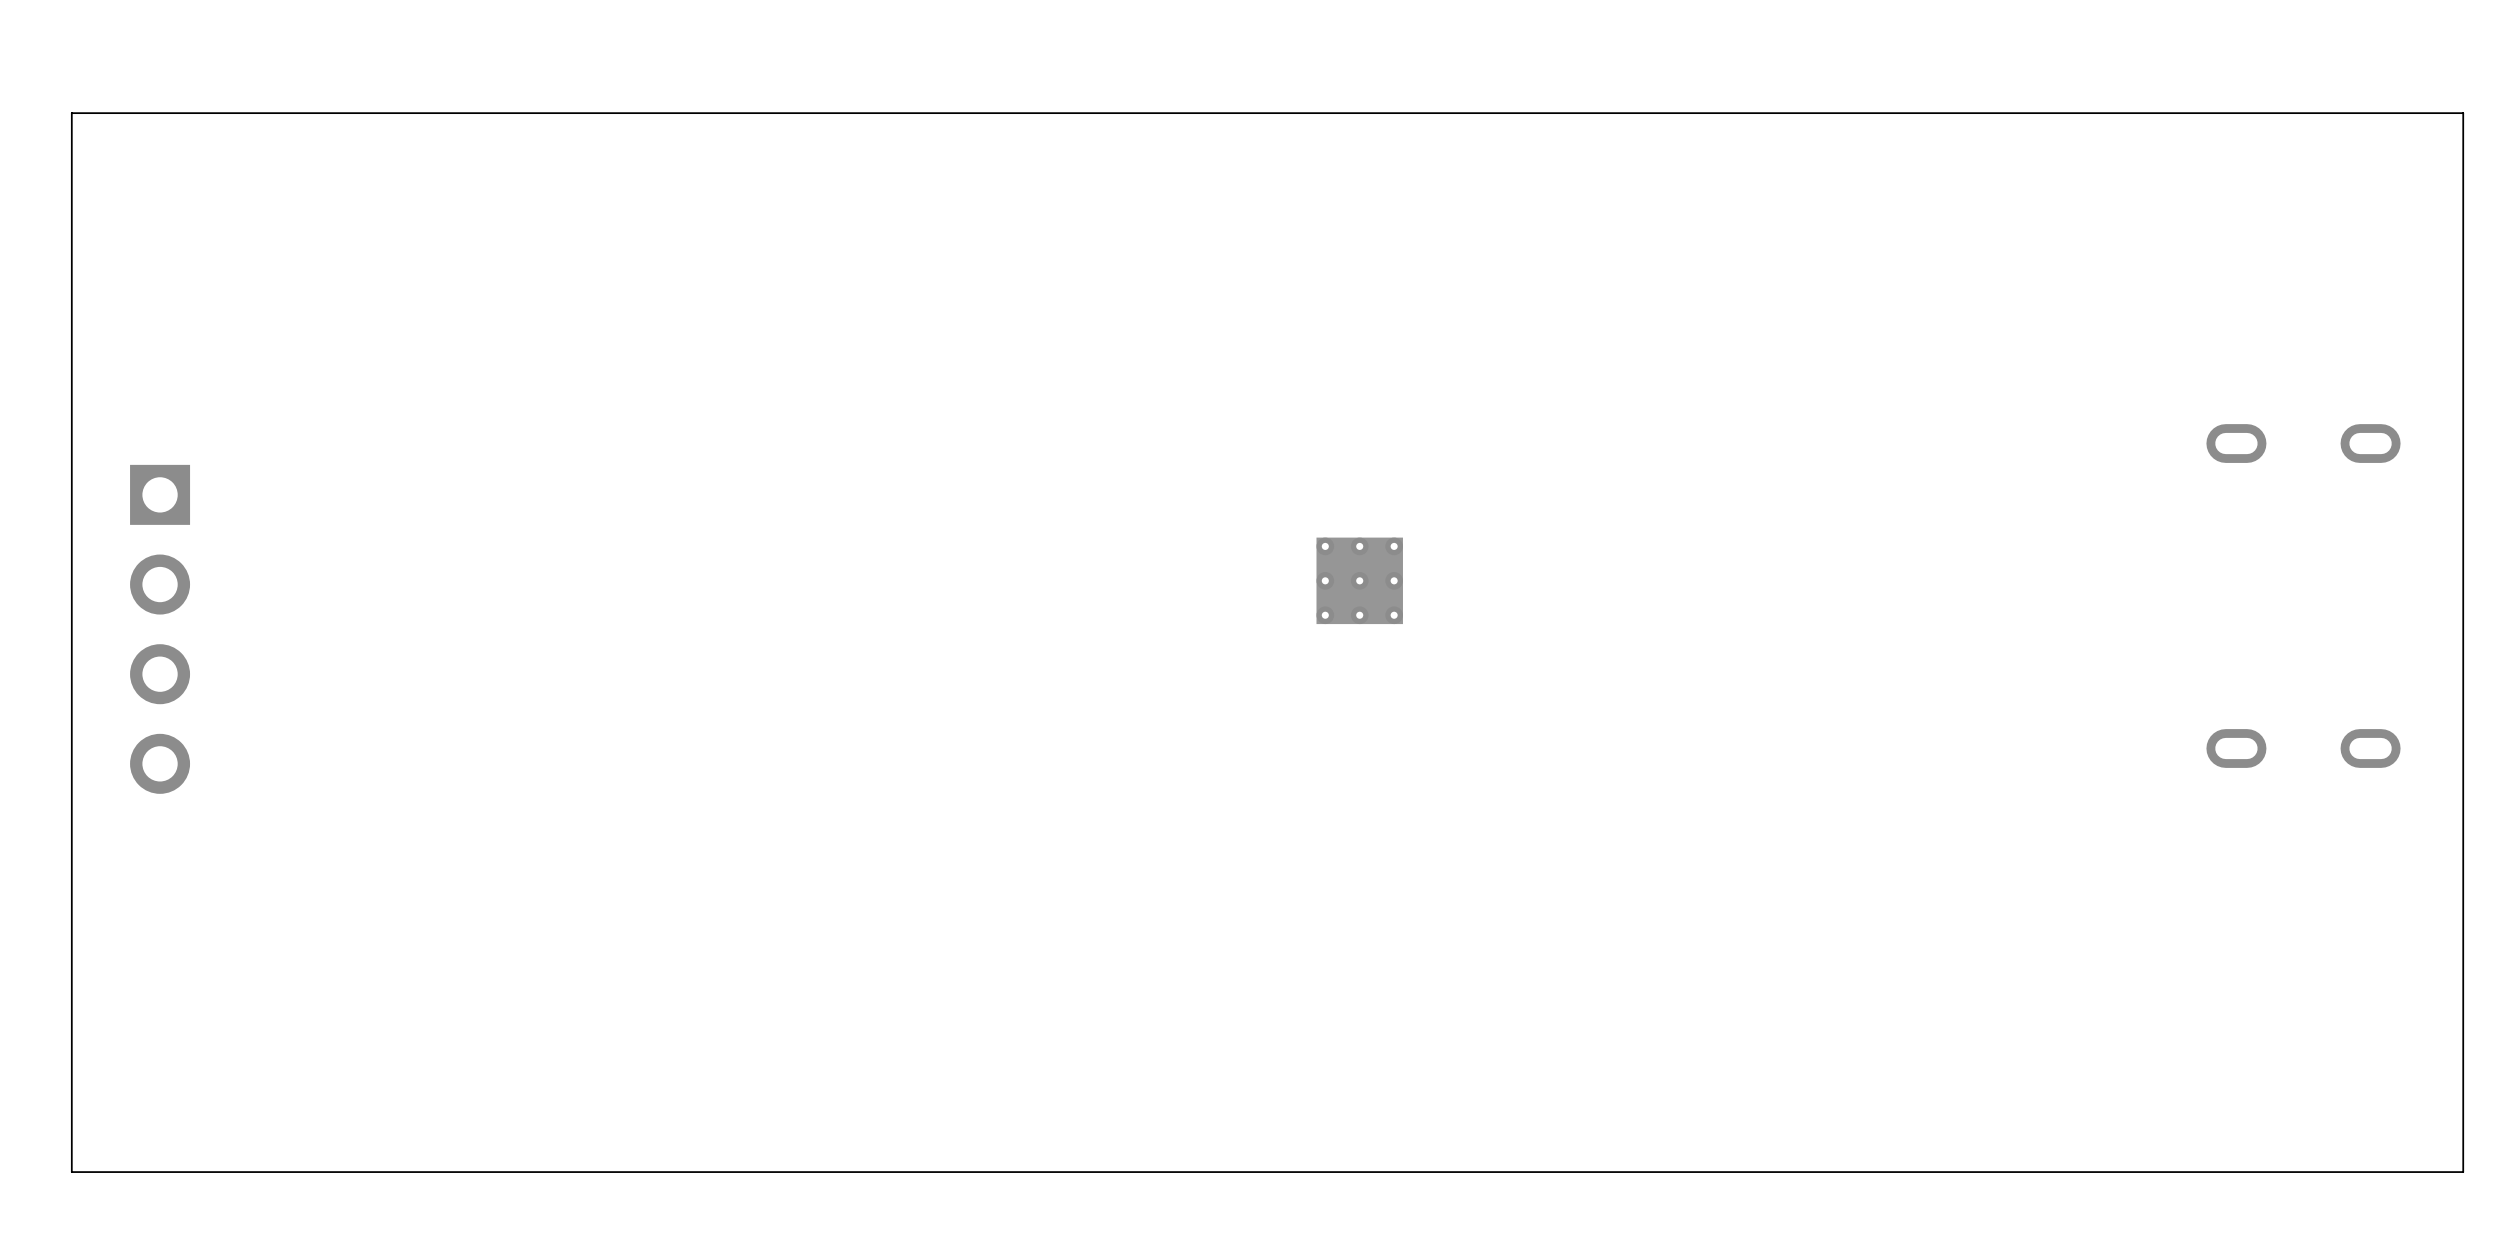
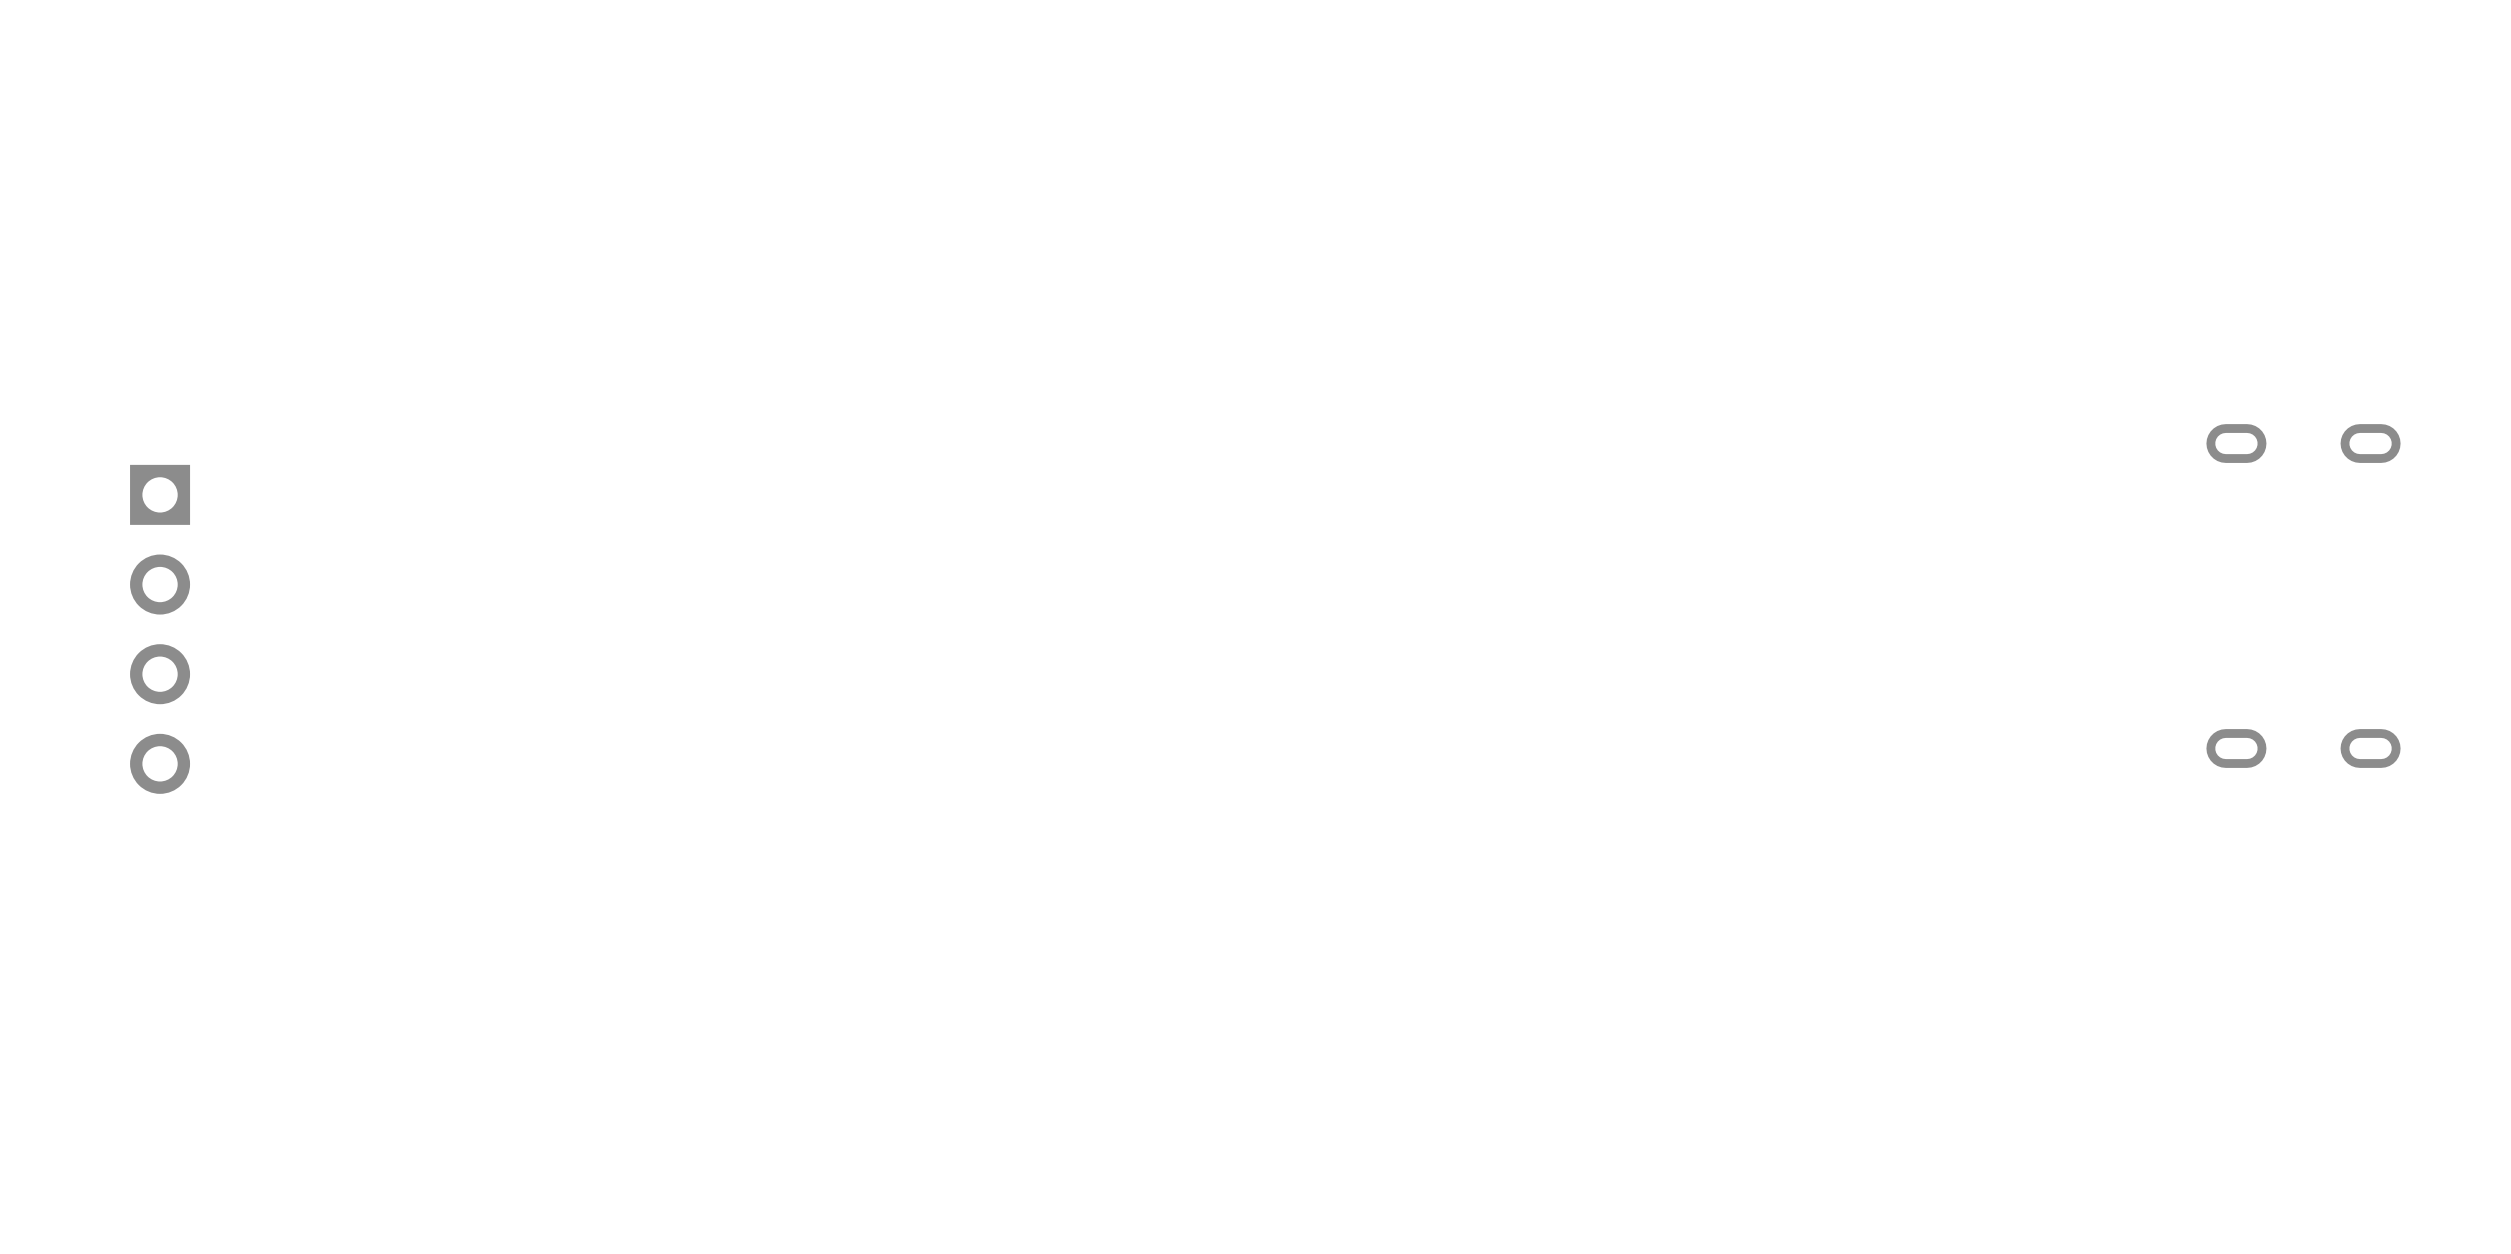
board edge: (2463, 113) (71, 113) (71, 1172) (2463, 1172) (2463, 113) -> none
part: (1359, 580) -> none

